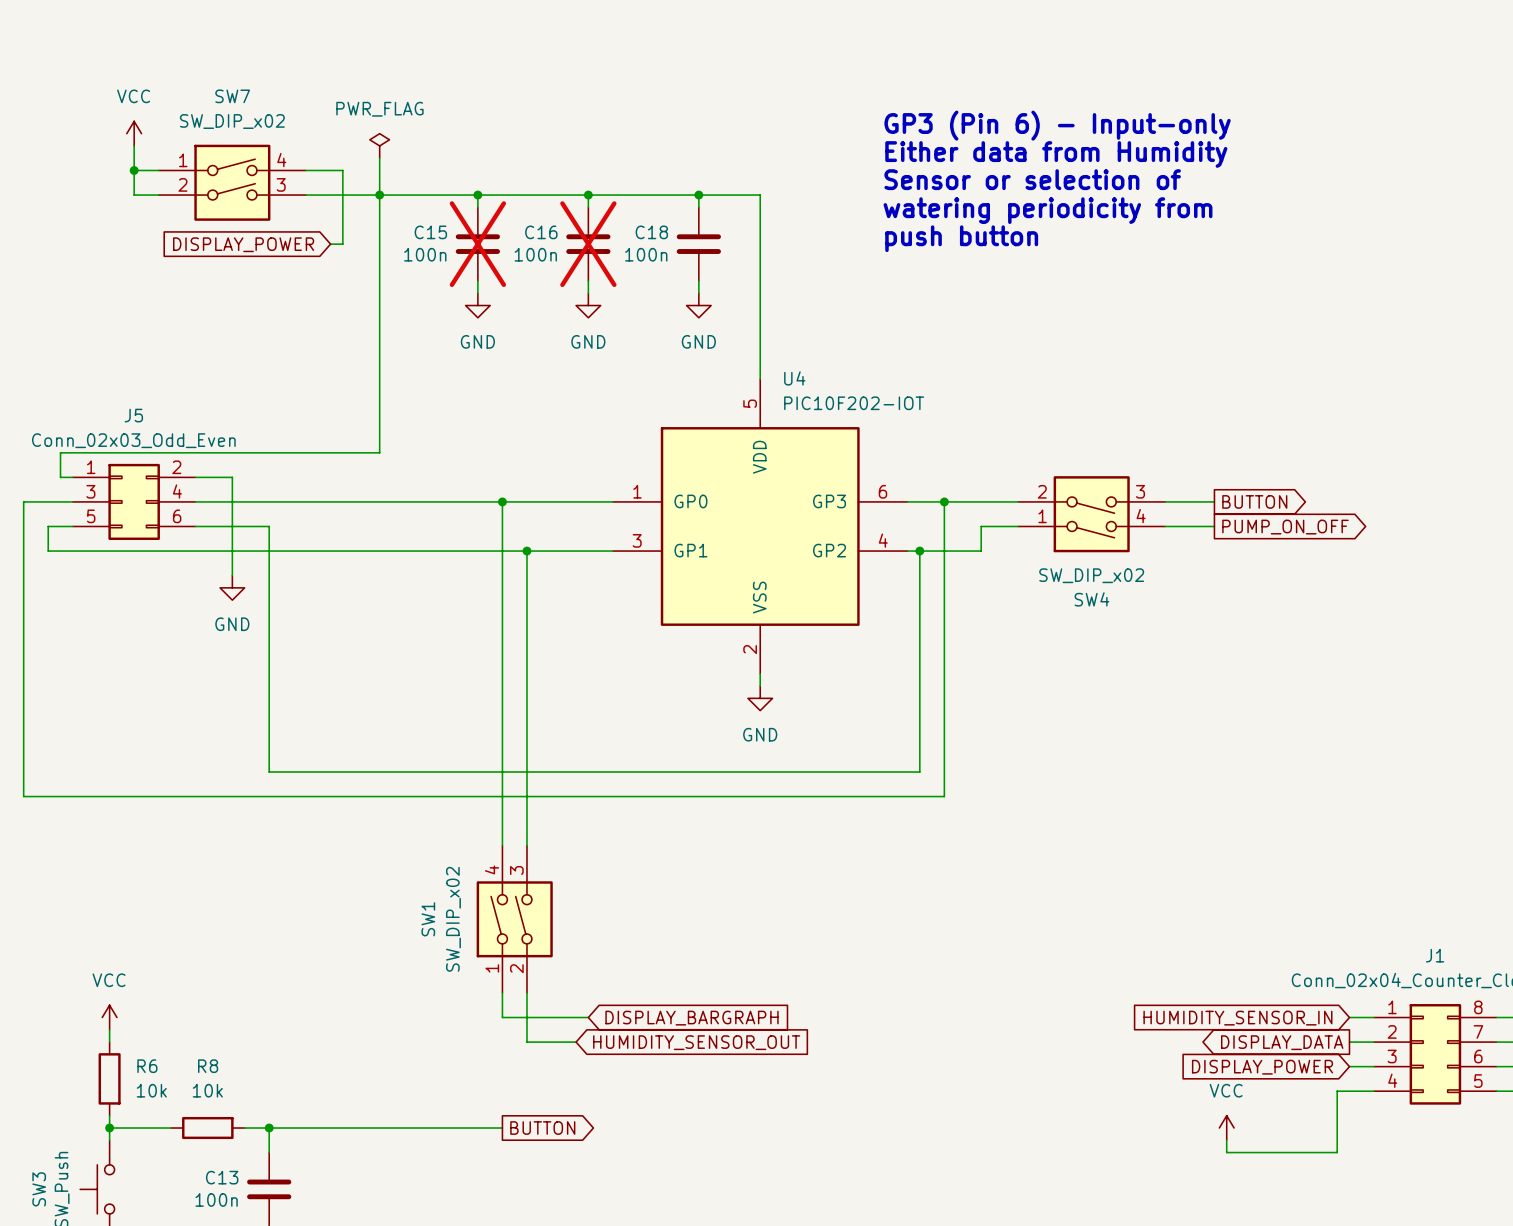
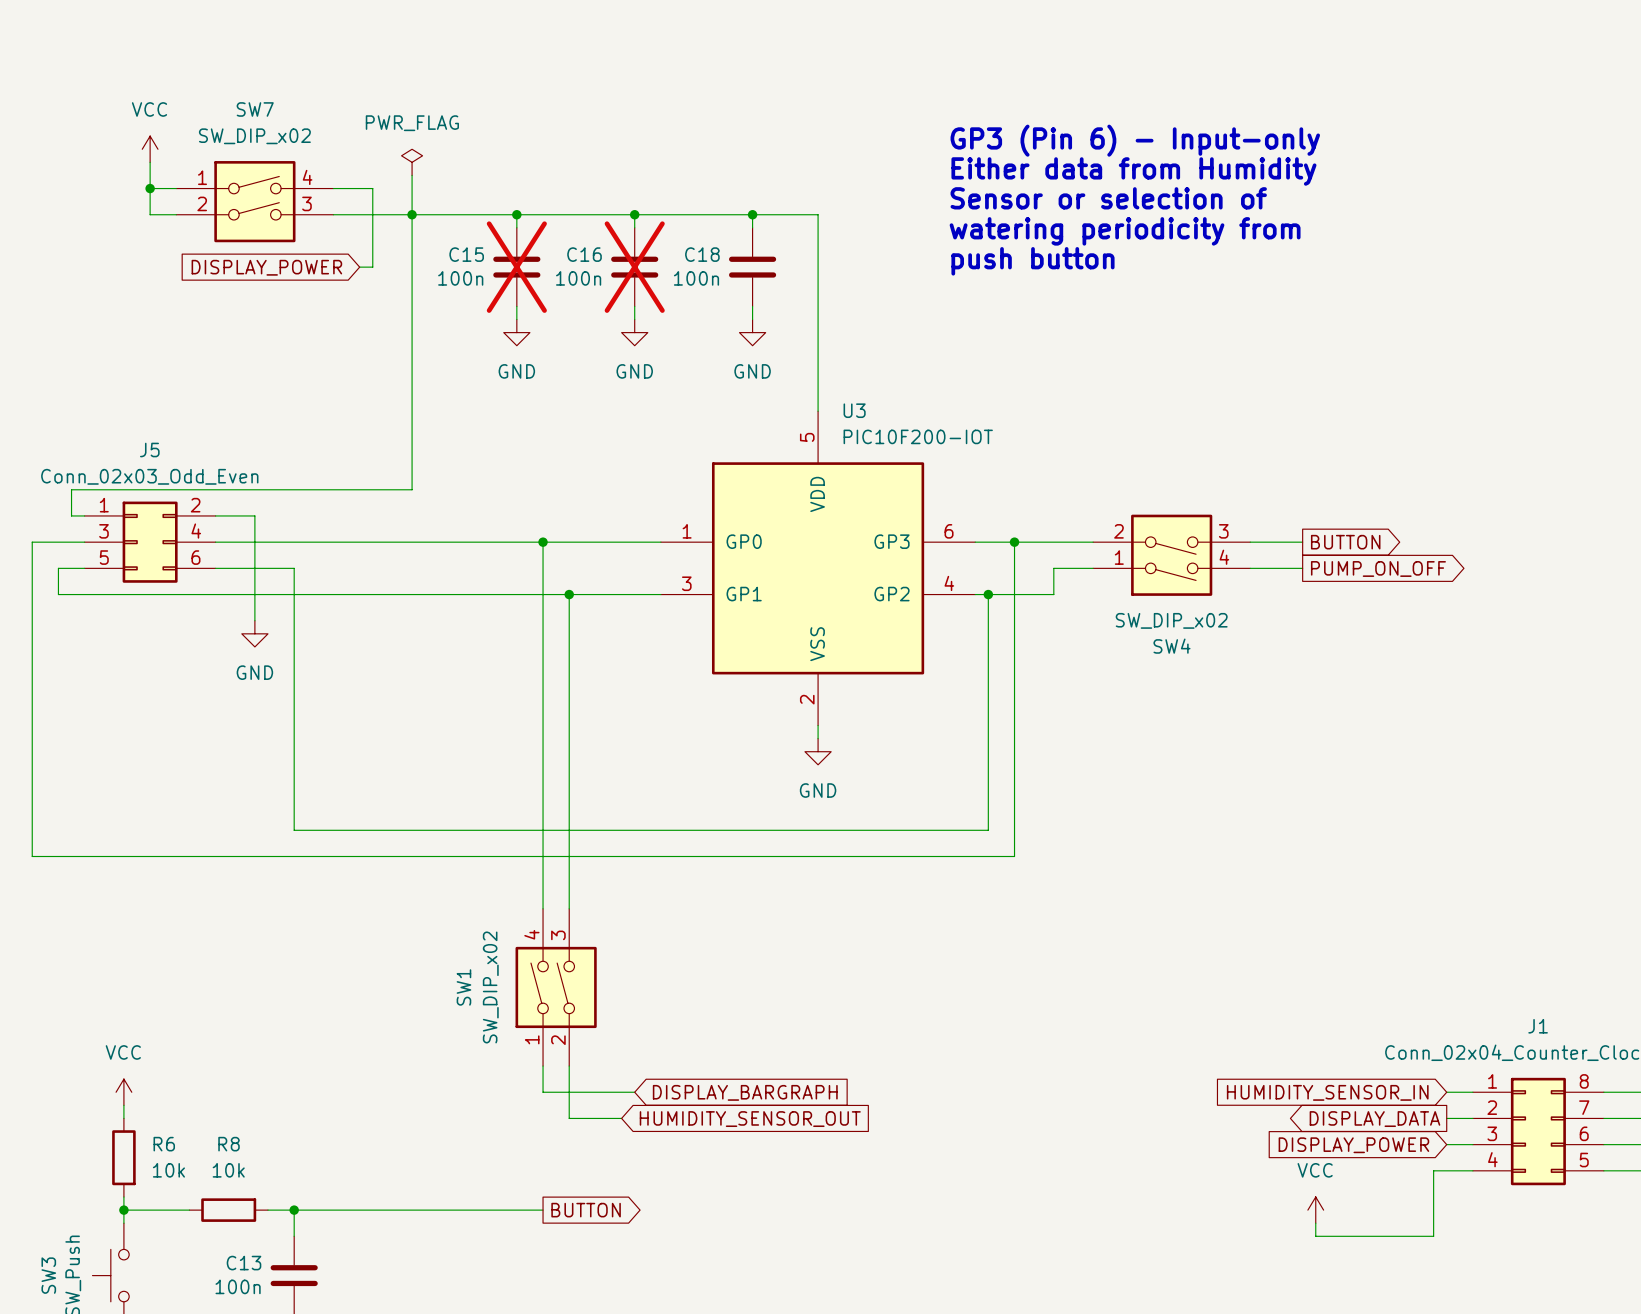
U4 name: U4 (794, 378) -> U3 (854, 410)
U4 value: PIC10F202-IOT (854, 403) -> PIC10F200-IOT (918, 436)

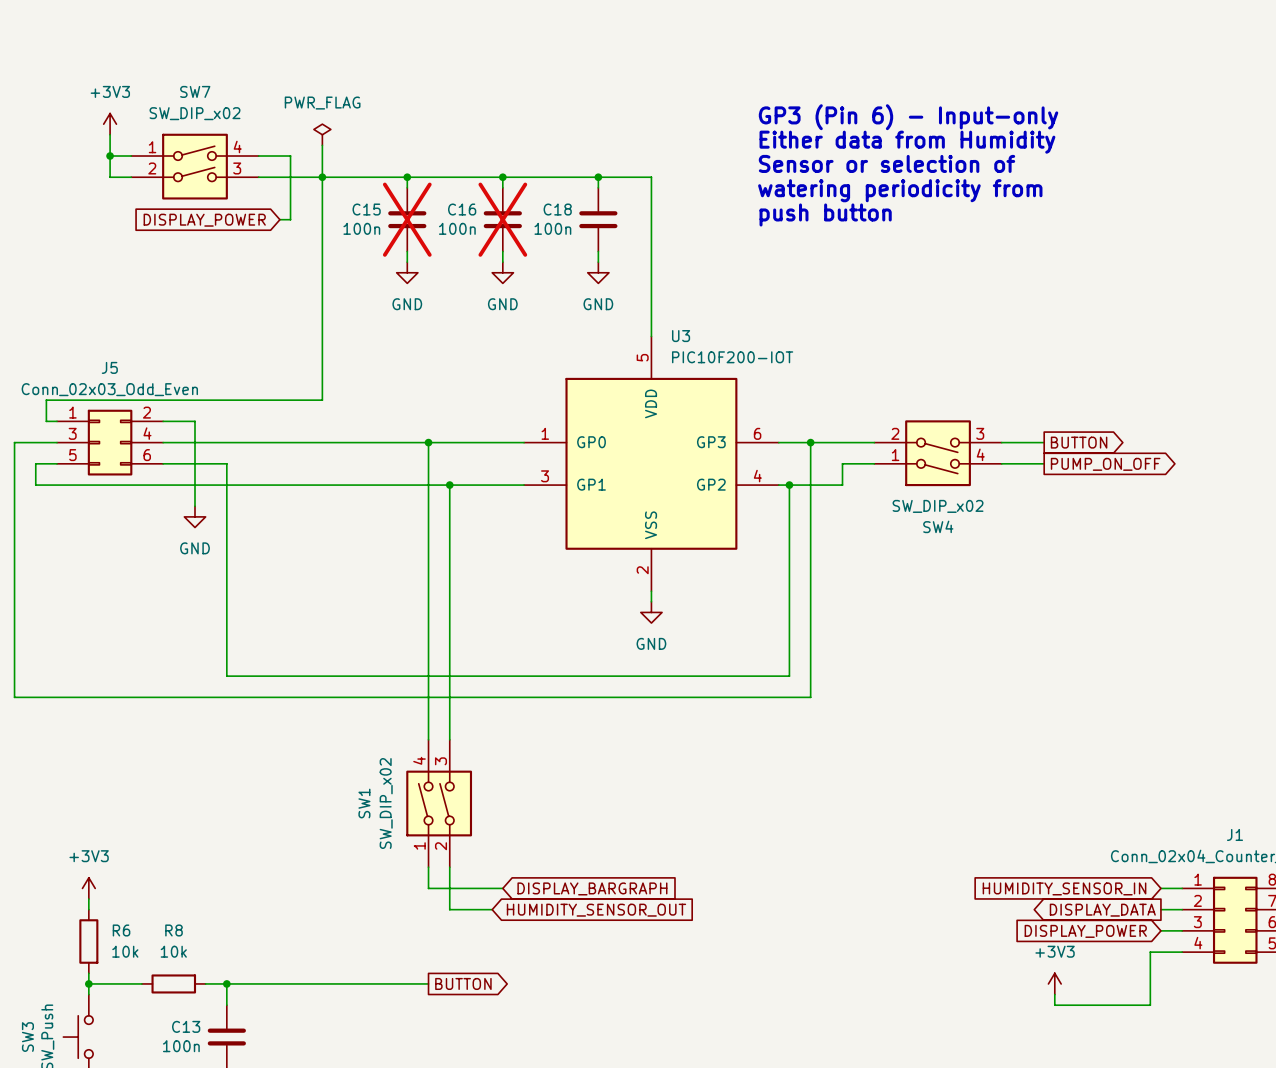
power symbol: VCC (150, 149) -> +3V3 (110, 124)
power symbol: VCC (123, 1092) -> +3V3 (88, 888)
power symbol: VCC (1315, 1210) -> +3V3 (1054, 983)

